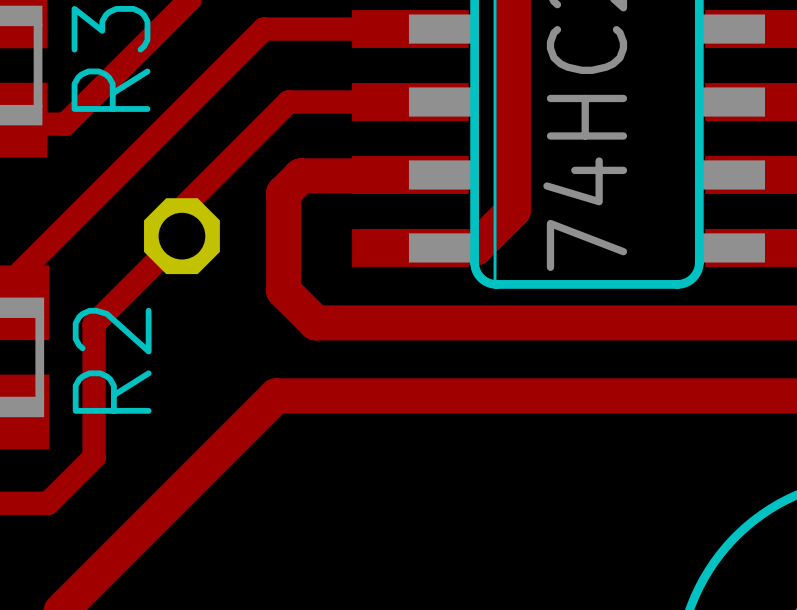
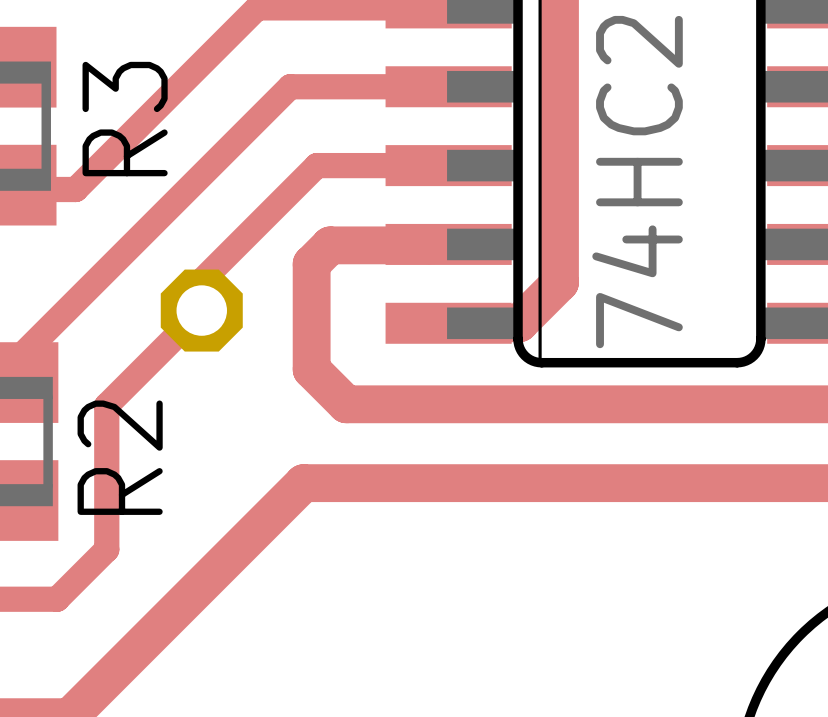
R2 name position: R2 (112, 360) -> R2 (120, 457)

